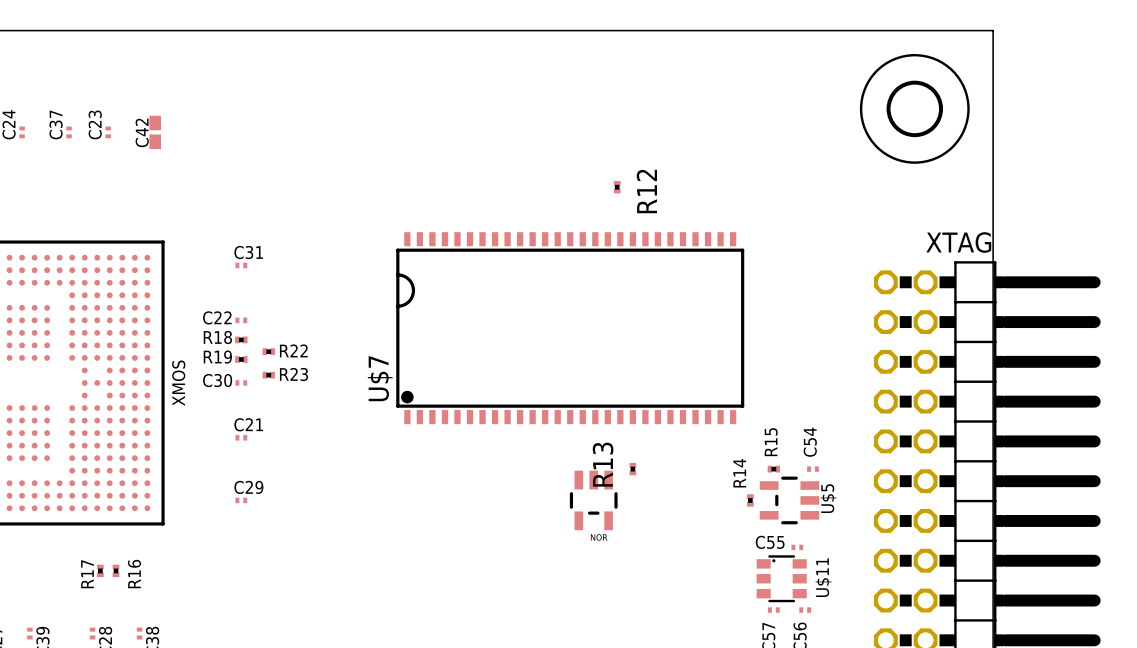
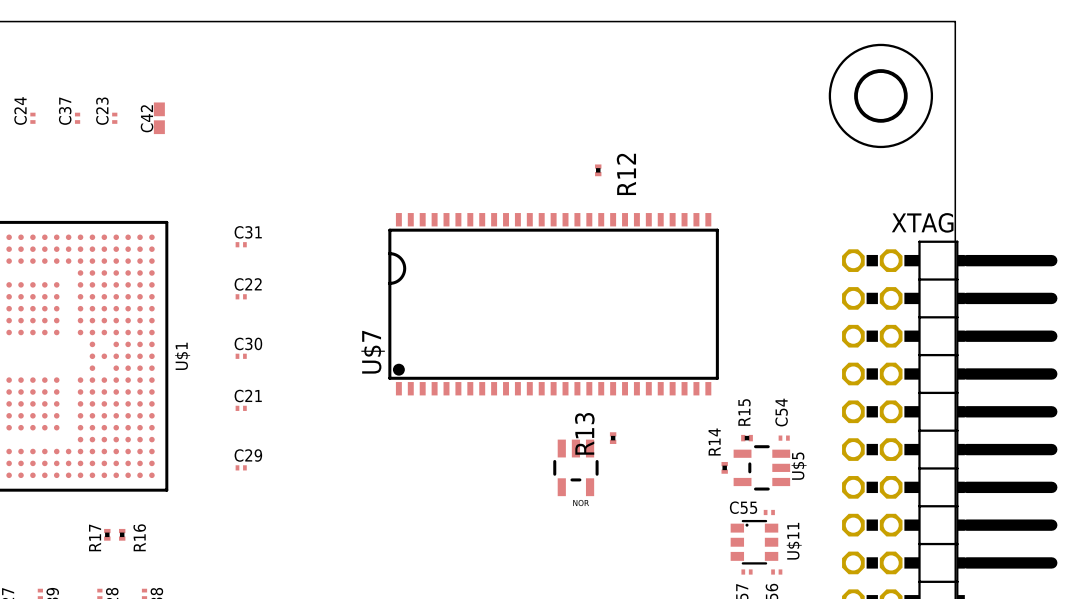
C22 name position: C22 (217, 317) -> C22 (248, 284)
R18: (241, 339) -> none
R22: (268, 351) -> none
R19: (241, 359) -> none
R23: (268, 375) -> none
C30 name position: C30 (217, 380) -> C30 (248, 343)
XMOS name: XMOS (178, 383) -> U$1 (182, 356)

